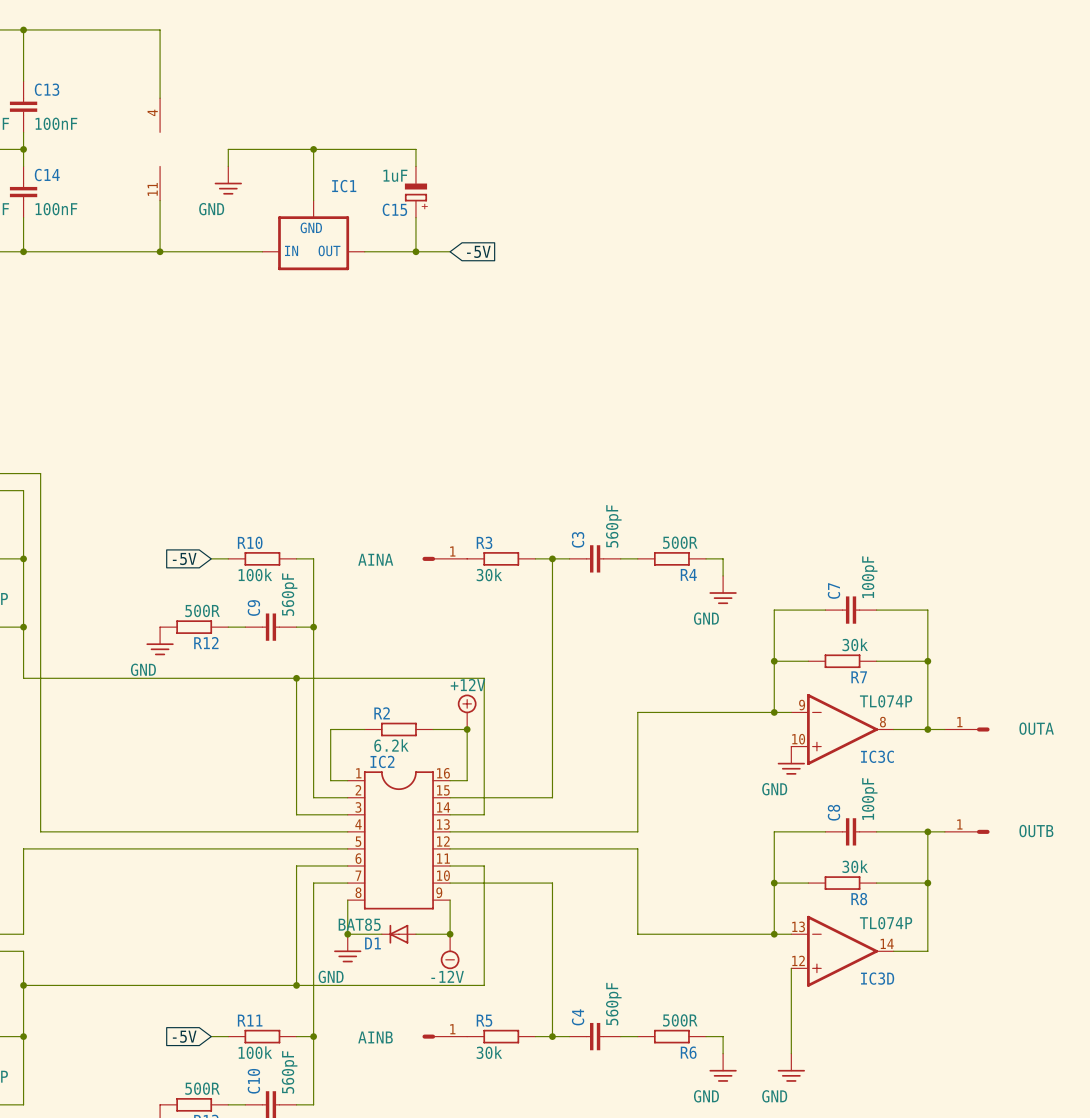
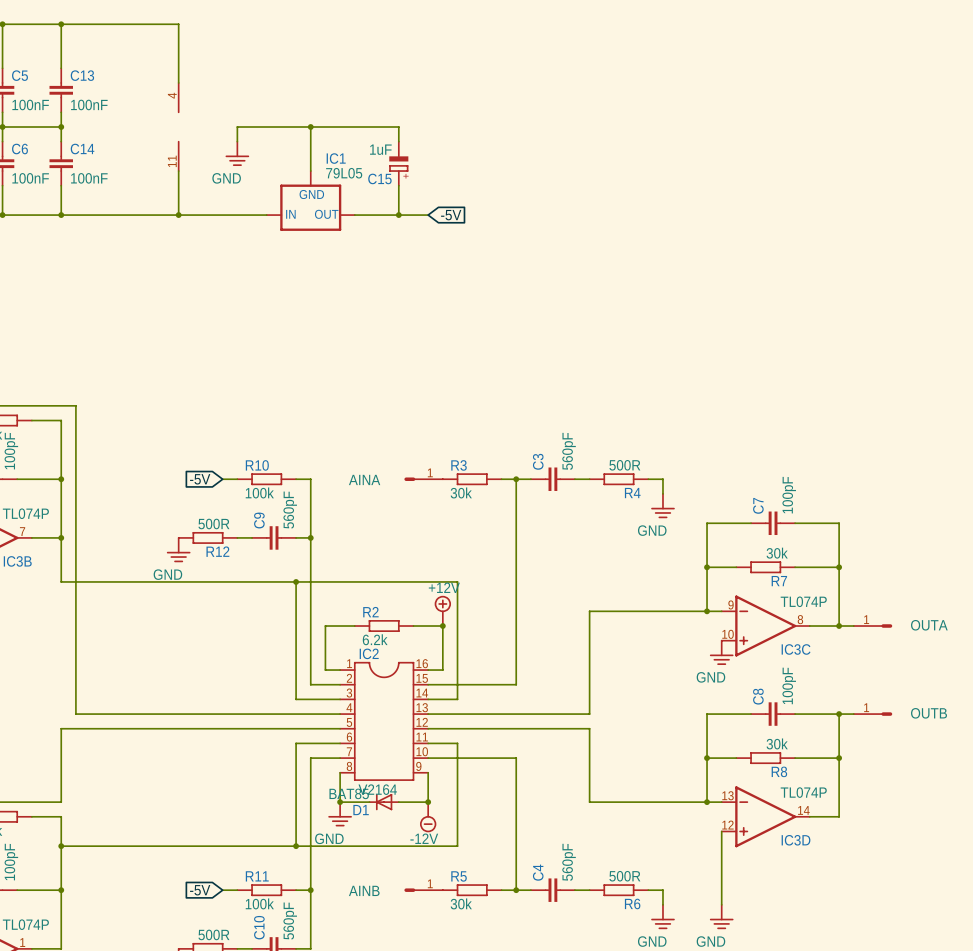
IC1 value: none -> 79L05 (344, 173)
IC2 value: none -> V2164 (377, 789)

